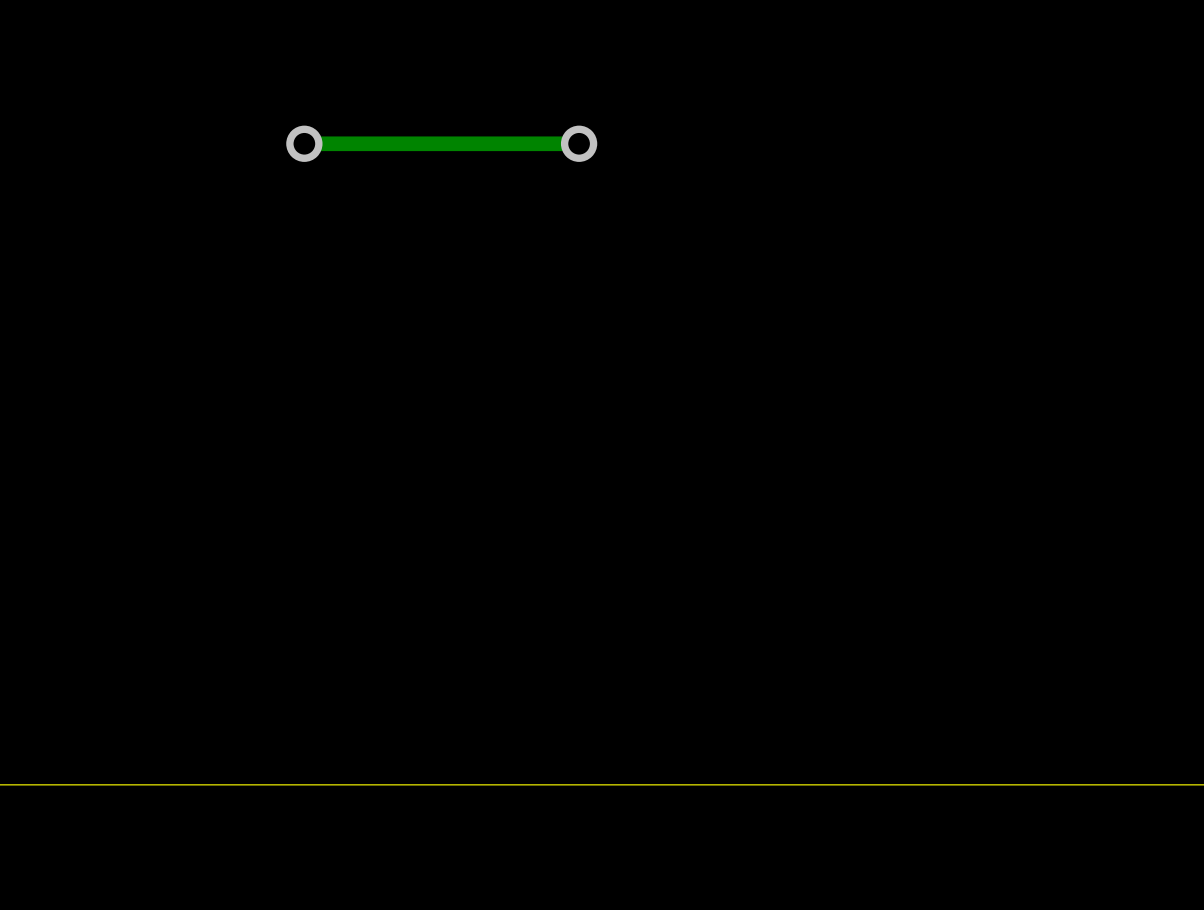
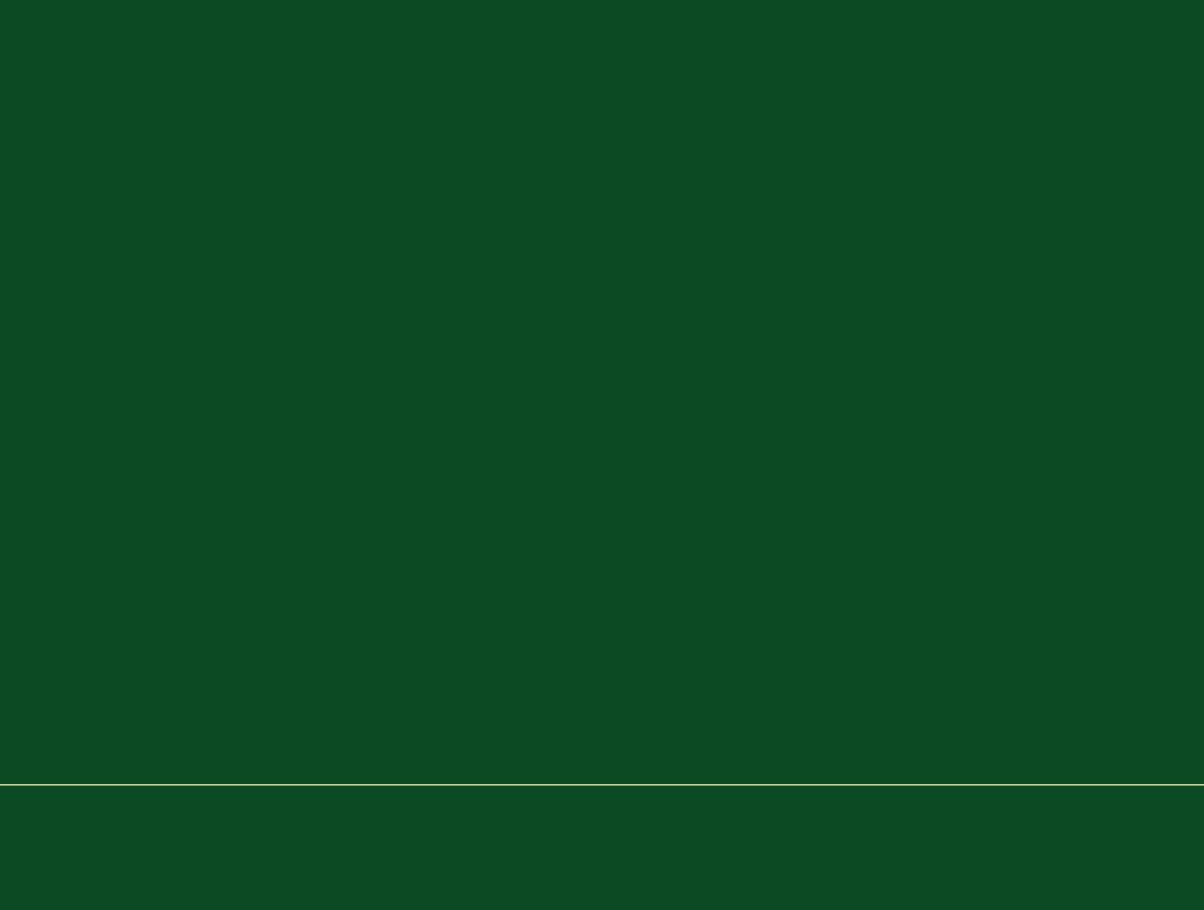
via: (304, 143) -> none
track: (579, 143) (304, 143) -> none
via: (579, 143) -> none

